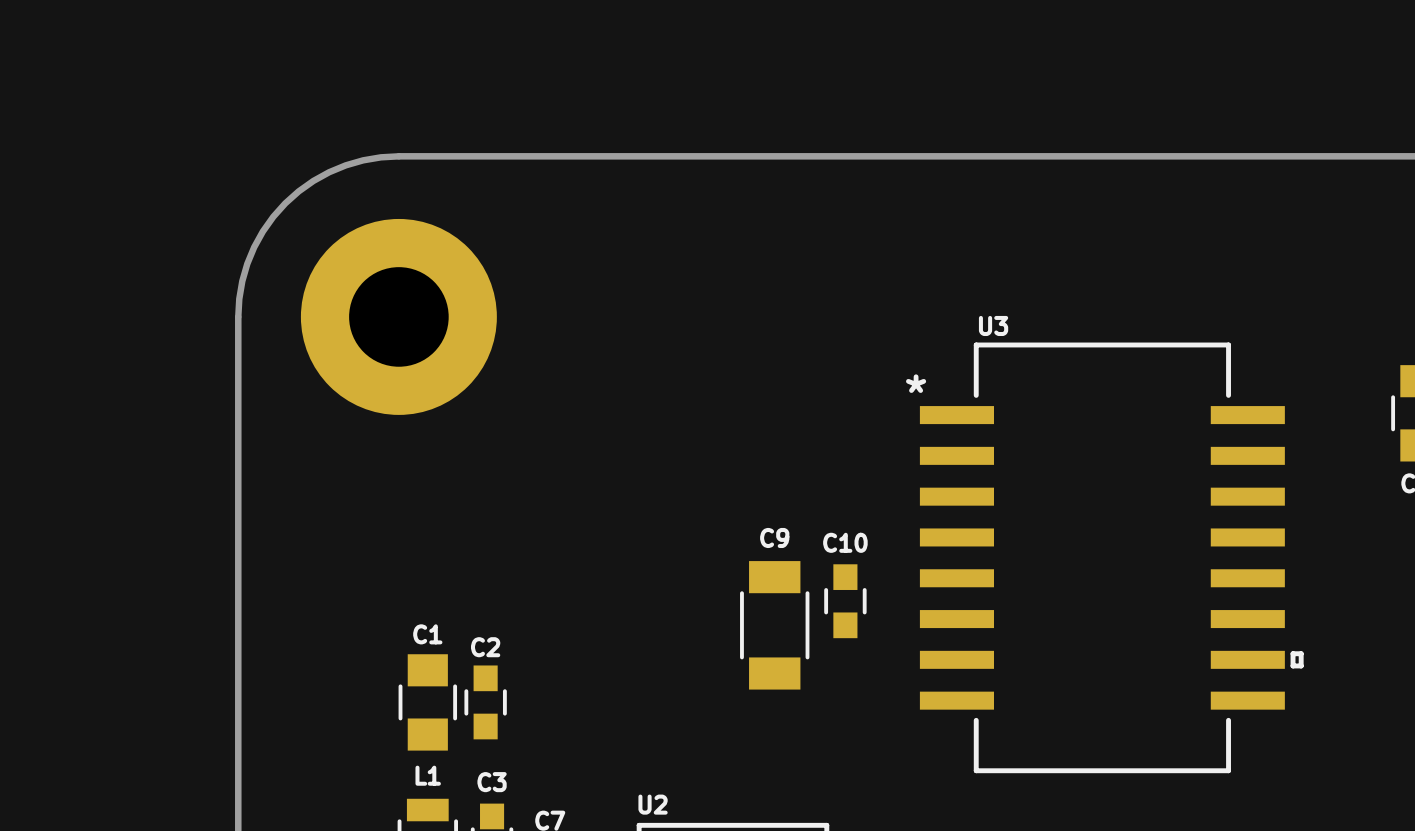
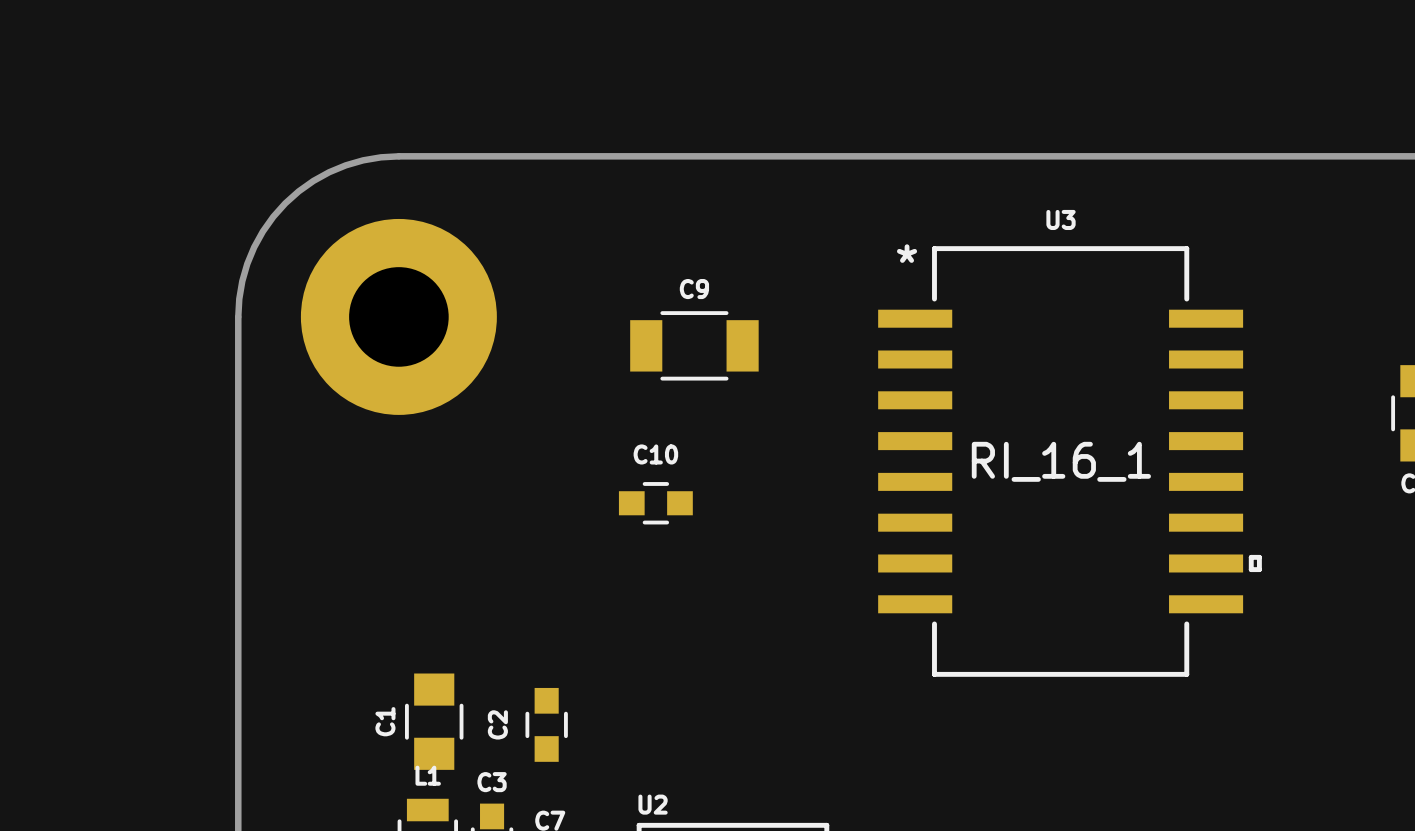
U3 name position: U3 (993, 325) -> U3 (1061, 219)
U3 text position: * (916, 383) -> * (907, 253)
U3 value: none -> RI_16_1 (1061, 461)
U3 position: (1111, 557) -> (1070, 461)
C10 rotation: 0° (845, 601) -> 90° clockwise (655, 503)
C10 position: (845, 601) -> (655, 503)
C9 rotation: 0° (774, 625) -> 90° clockwise (694, 345)
C9 position: (774, 625) -> (694, 345)
C1 name rotation: 0° (427, 634) -> 90° counterclockwise (385, 721)
C1 name position: C1 (427, 634) -> C1 (385, 721)
C2 name rotation: 0° (485, 647) -> 90° counterclockwise (497, 724)
C2 name position: C2 (485, 647) -> C2 (497, 724)
C1 position: (427, 702) -> (434, 721)
C2 position: (485, 702) -> (546, 724)

